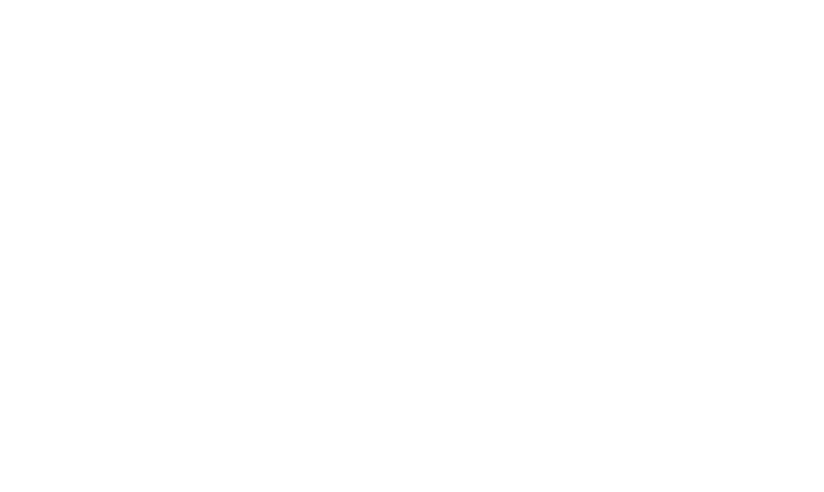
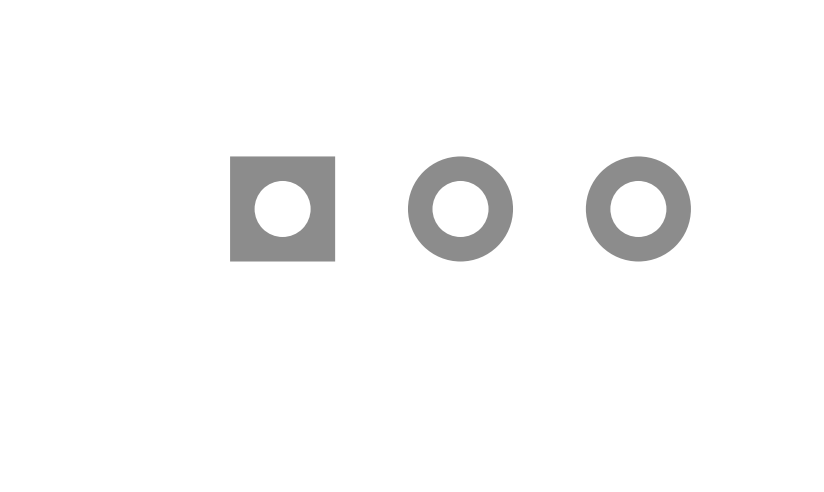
part: none -> (460, 208)

